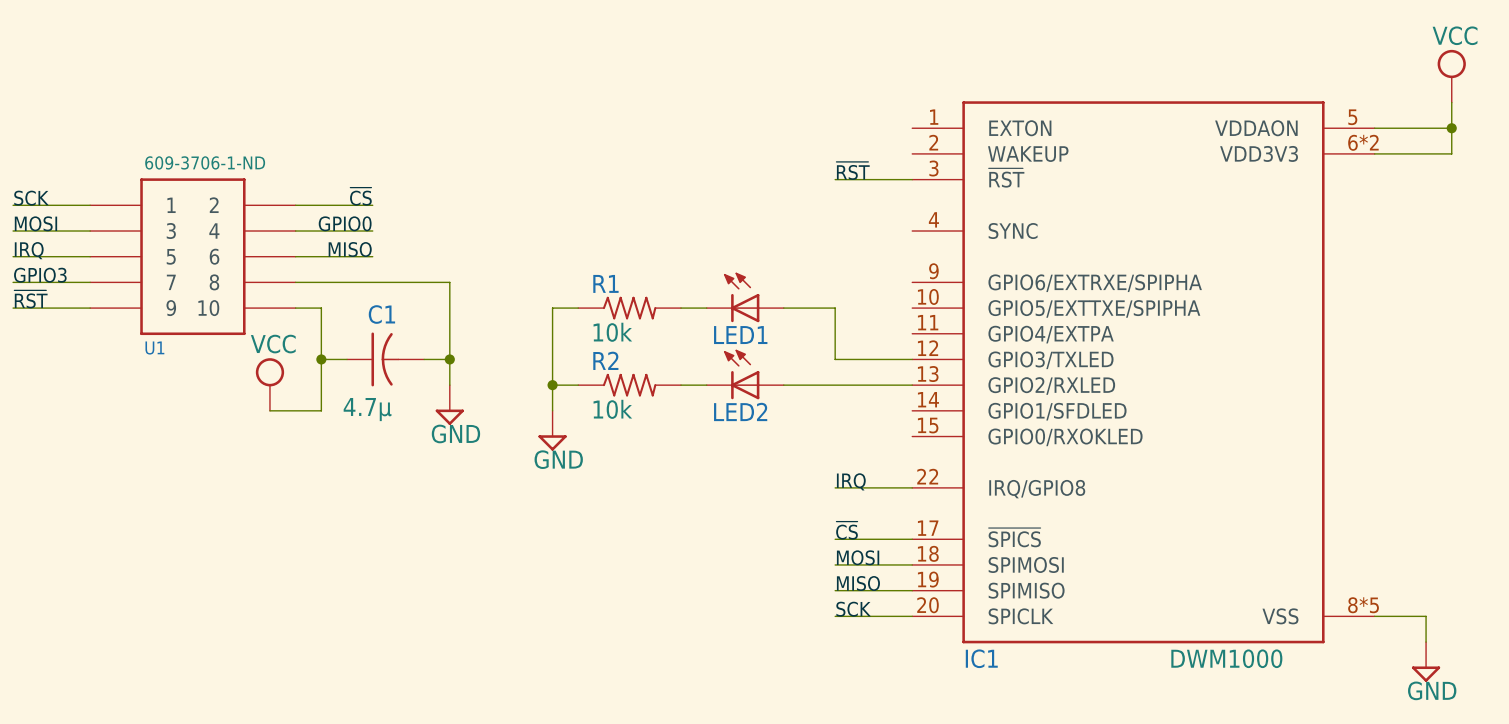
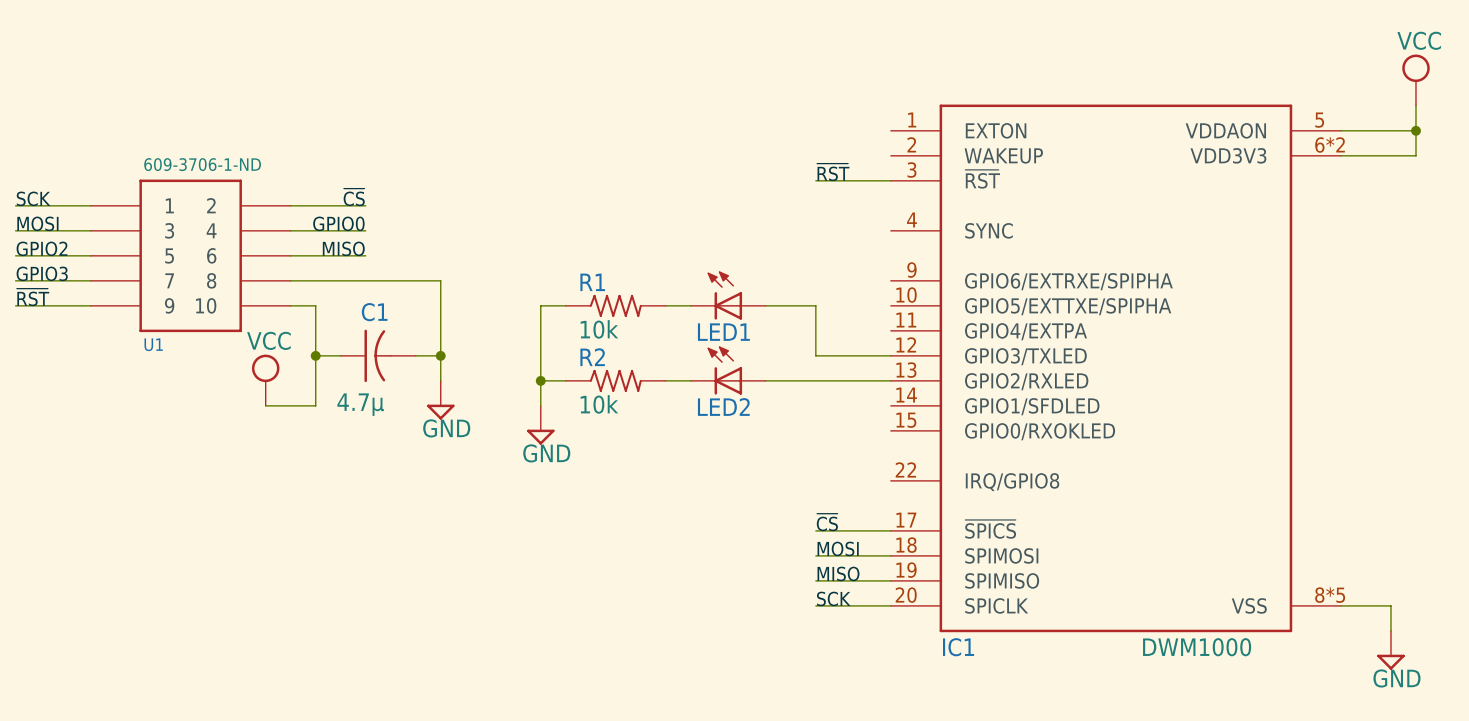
label: IRQ (29, 250) -> GPIO2 (42, 248)
label: IRQ (851, 481) -> none
wire: (835, 487) (912, 487) -> none

